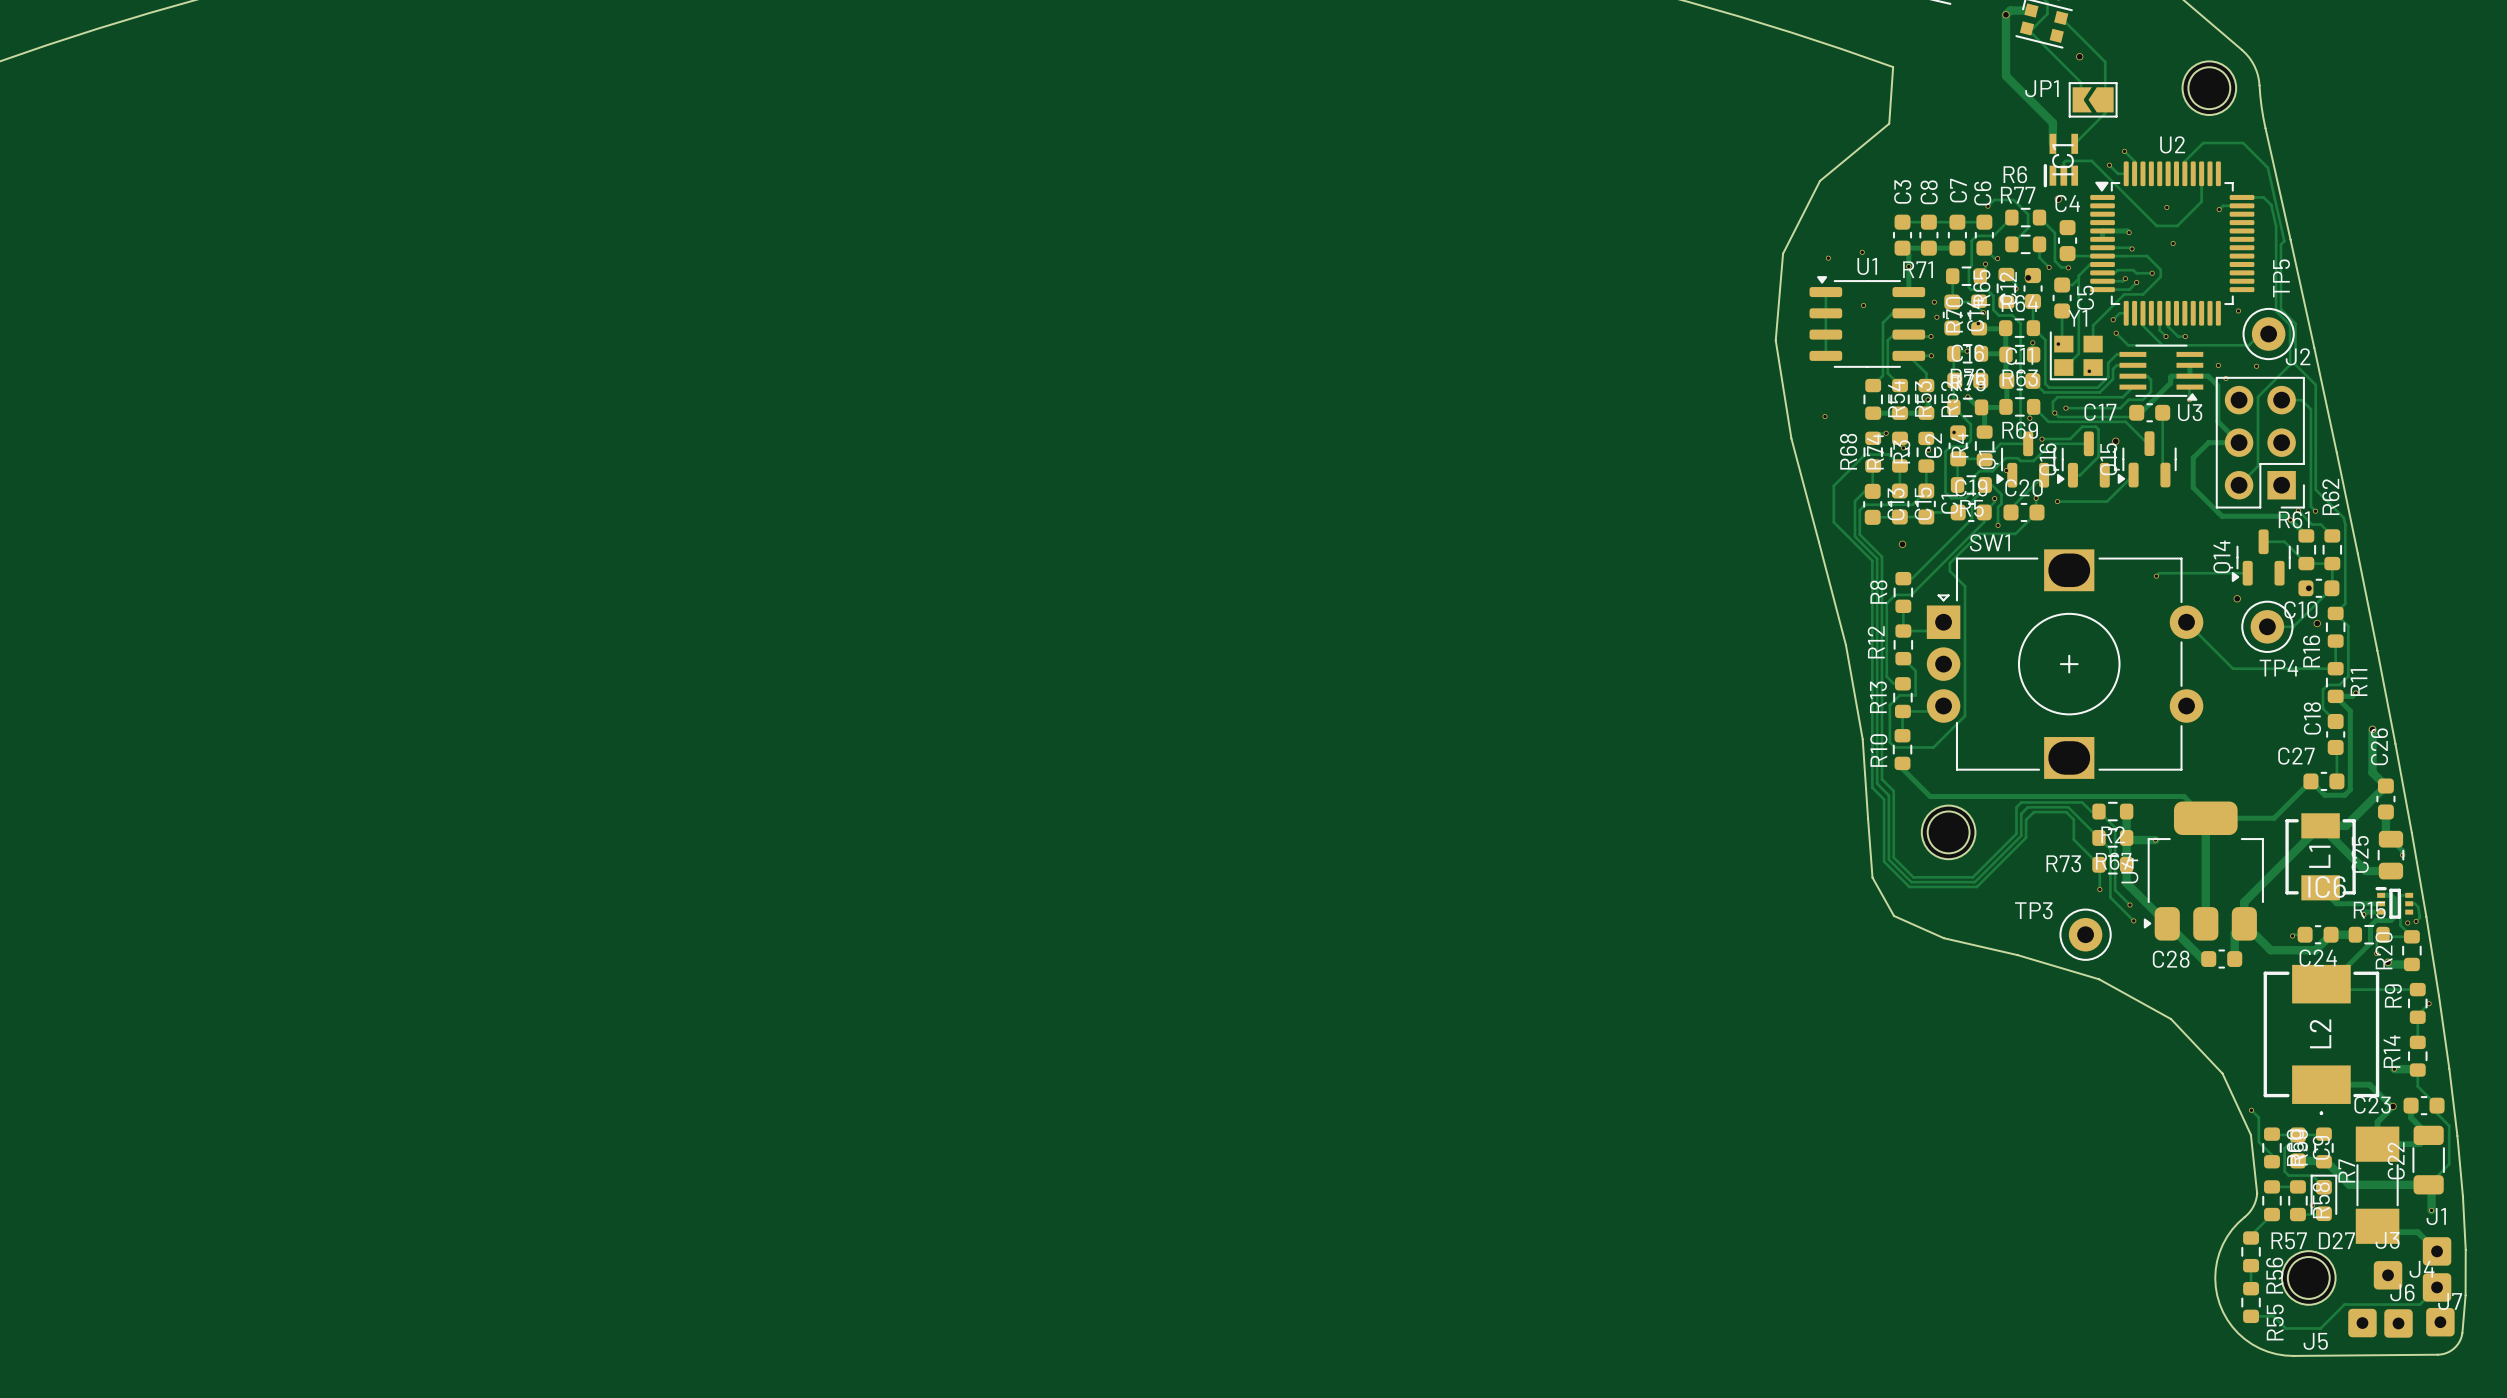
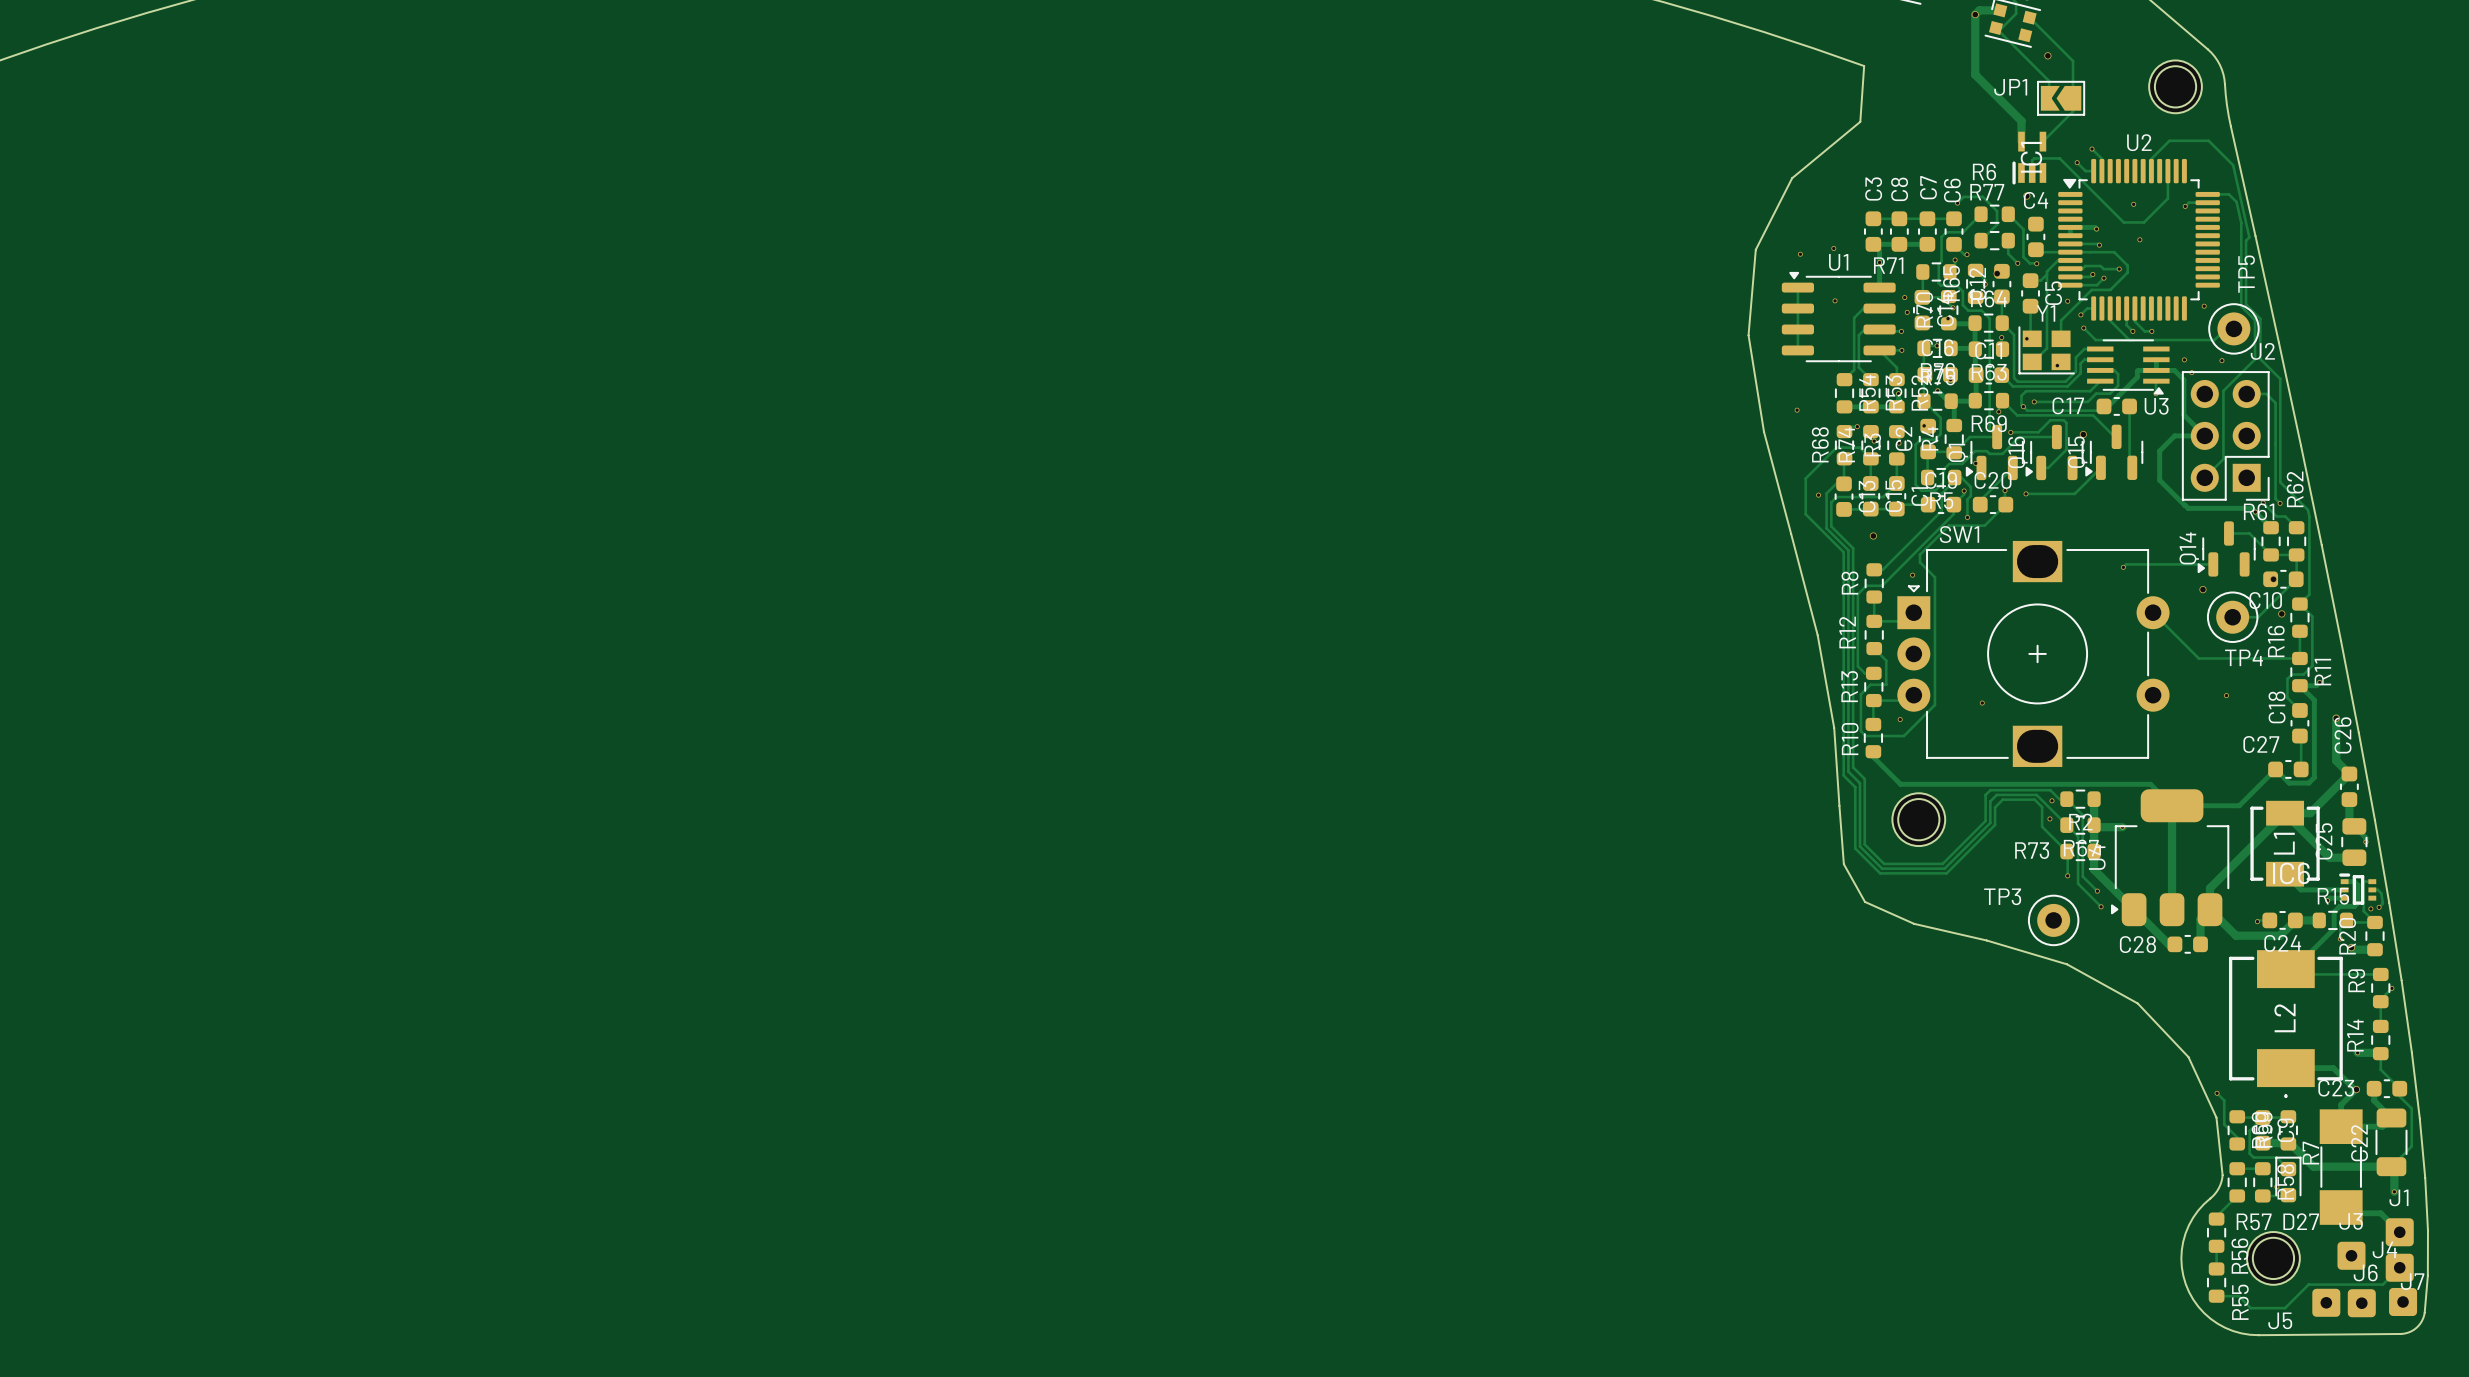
via: none -> (2067, 301)
via: none -> (1818, 495)
via: none -> (1912, 575)
via: none -> (2226, 695)
via: none -> (1982, 703)
via: none -> (1900, 719)
via: none -> (2052, 800)
via: none -> (2049, 818)

